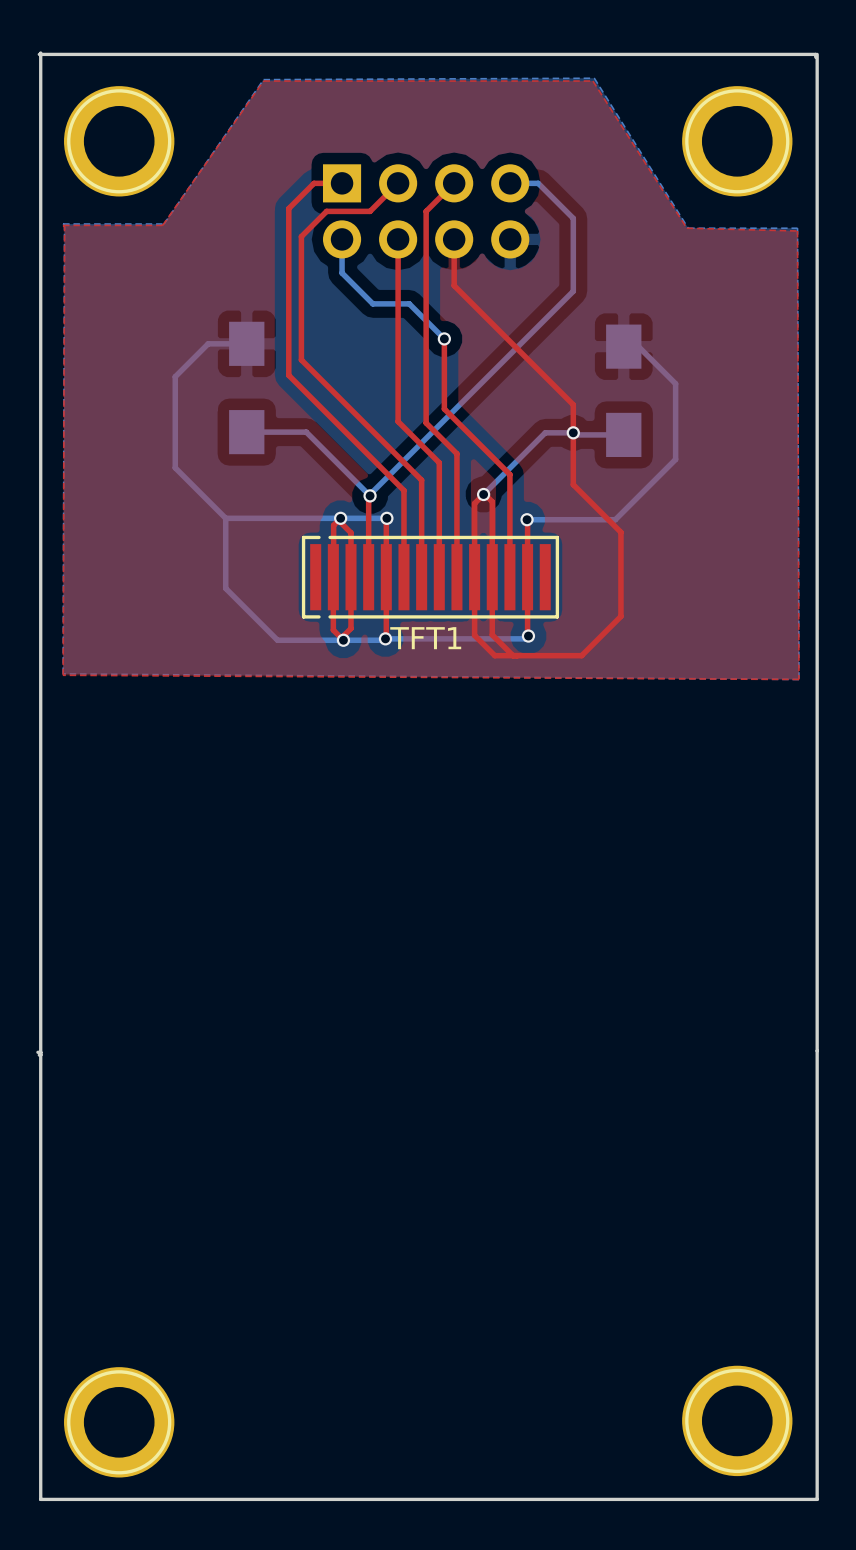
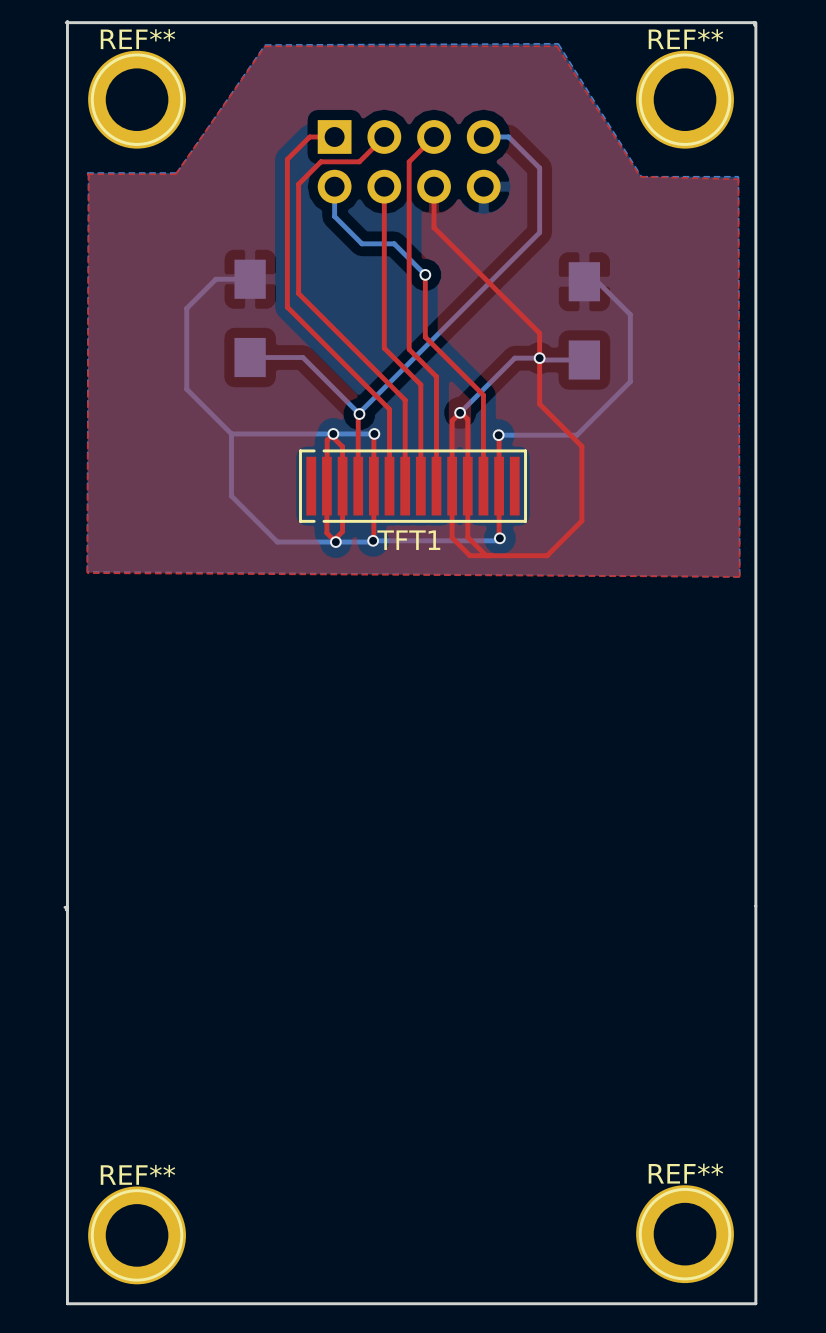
REF** name: none -> REF** (137, 39)
REF** name: none -> REF** (685, 39)
REF** name: none -> REF** (685, 1173)
REF** name: none -> REF** (137, 1174)

